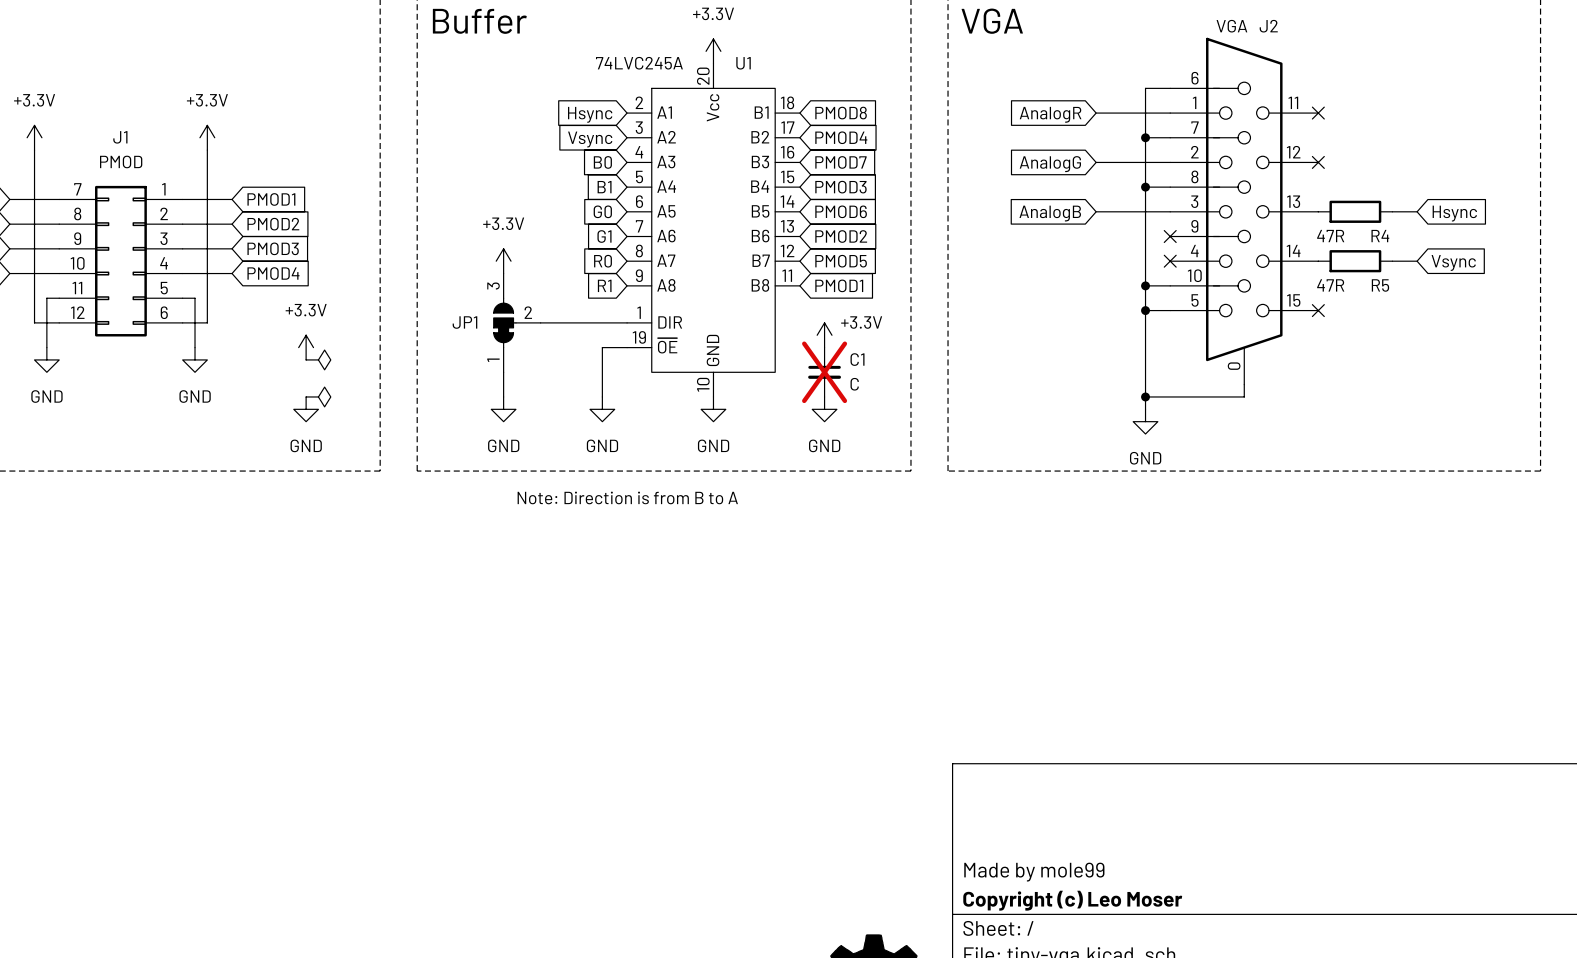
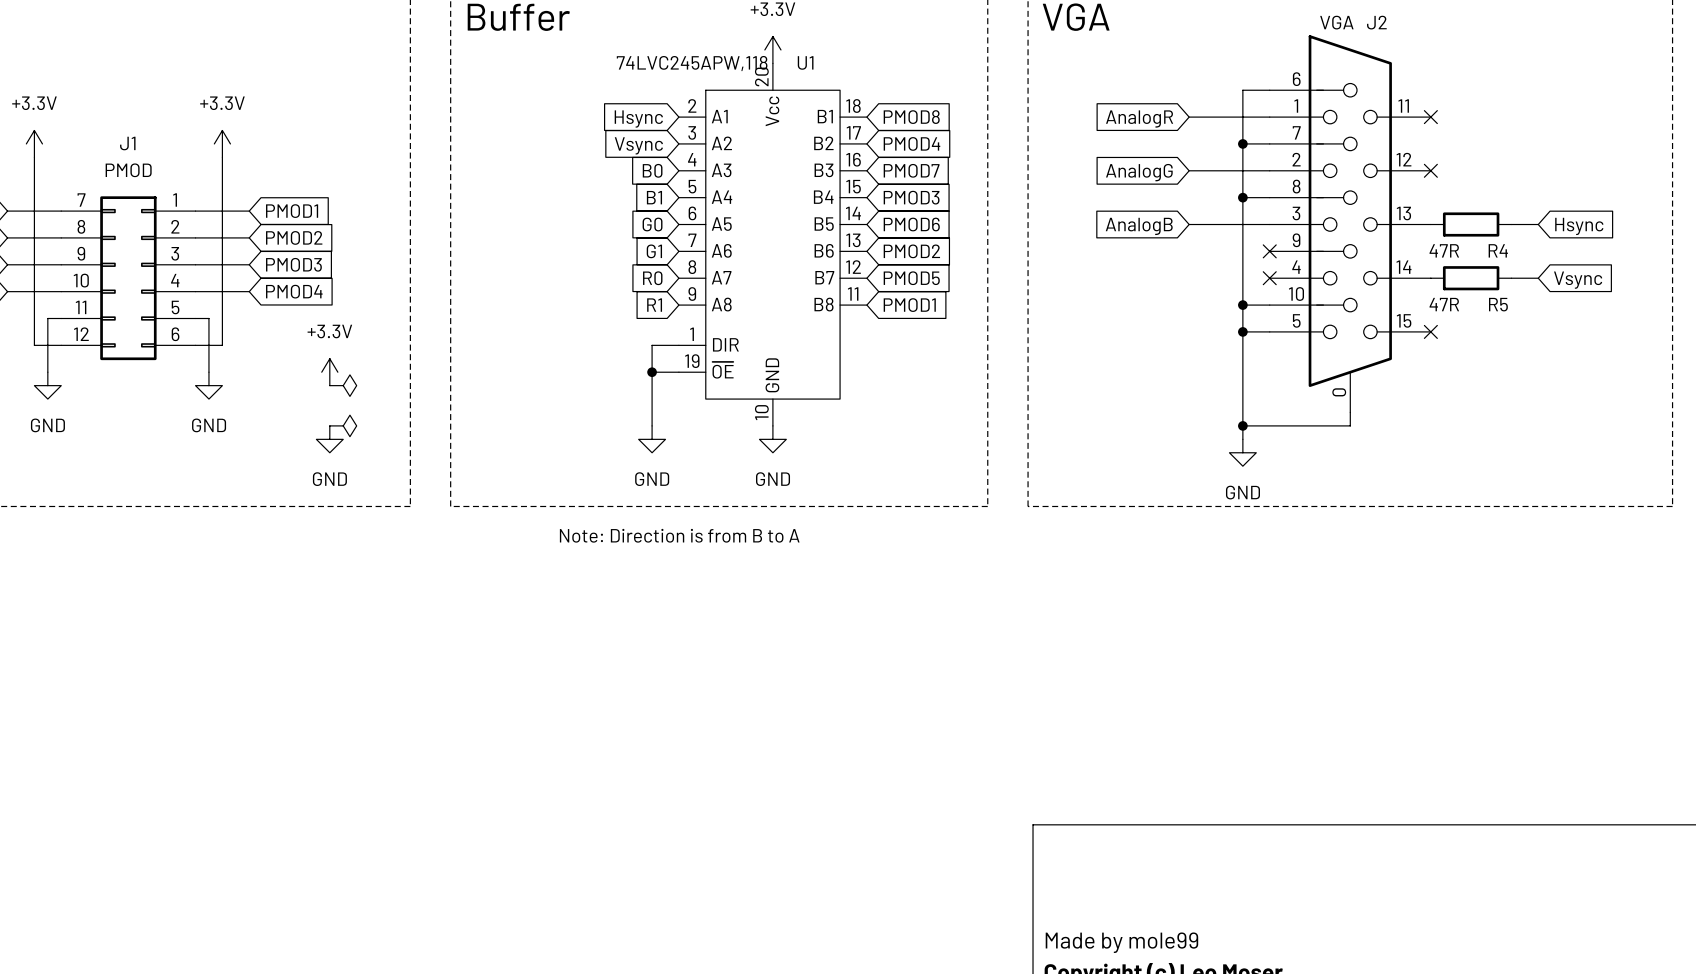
U1 value: 74LVC245A (639, 63) -> 74LVC245APW,118 (692, 63)
power symbol: +3.3V (503, 261) -> none
JP1: (517, 322) -> none
wire: (540, 322) (602, 322) -> (652, 372) (652, 345)
power symbol: +3.3V (824, 335) -> none
junction: none -> (652, 372)
wire: (503, 372) (503, 396) -> none
C1: C (824, 372) -> none
power symbol: GND (503, 409) -> none
power symbol: GND (824, 409) -> none

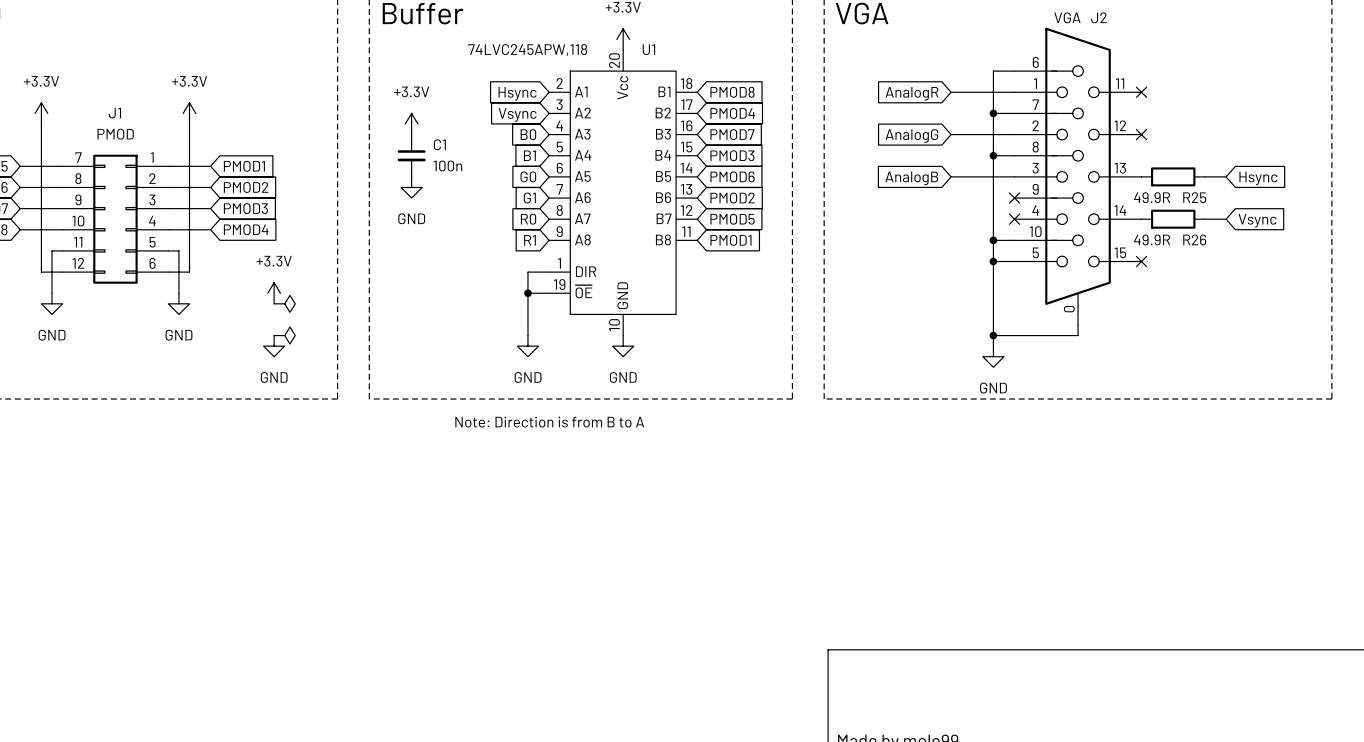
U1 value position: 74LVC245APW,118 (692, 63) -> 74LVC245APW,118 (527, 50)
power symbol: none -> +3.3V (411, 124)
C1: none -> 100n (411, 155)
power symbol: none -> GND (411, 187)
R4 value: 47R (1444, 250) -> 49.9R (1152, 197)
R4 name: R4 (1498, 250) -> R25 (1194, 197)
R5 value: 47R (1444, 304) -> 49.9R (1152, 239)
R5 name: R5 (1498, 304) -> R26 (1194, 239)

